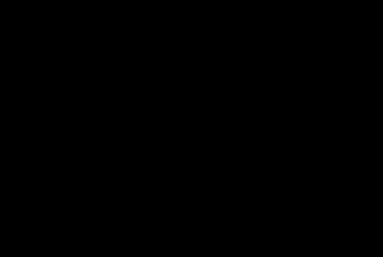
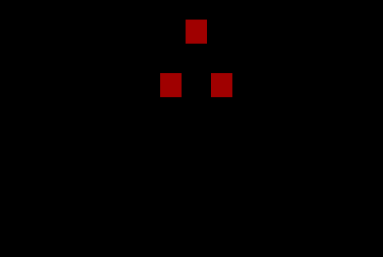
part: none -> (196, 58)

